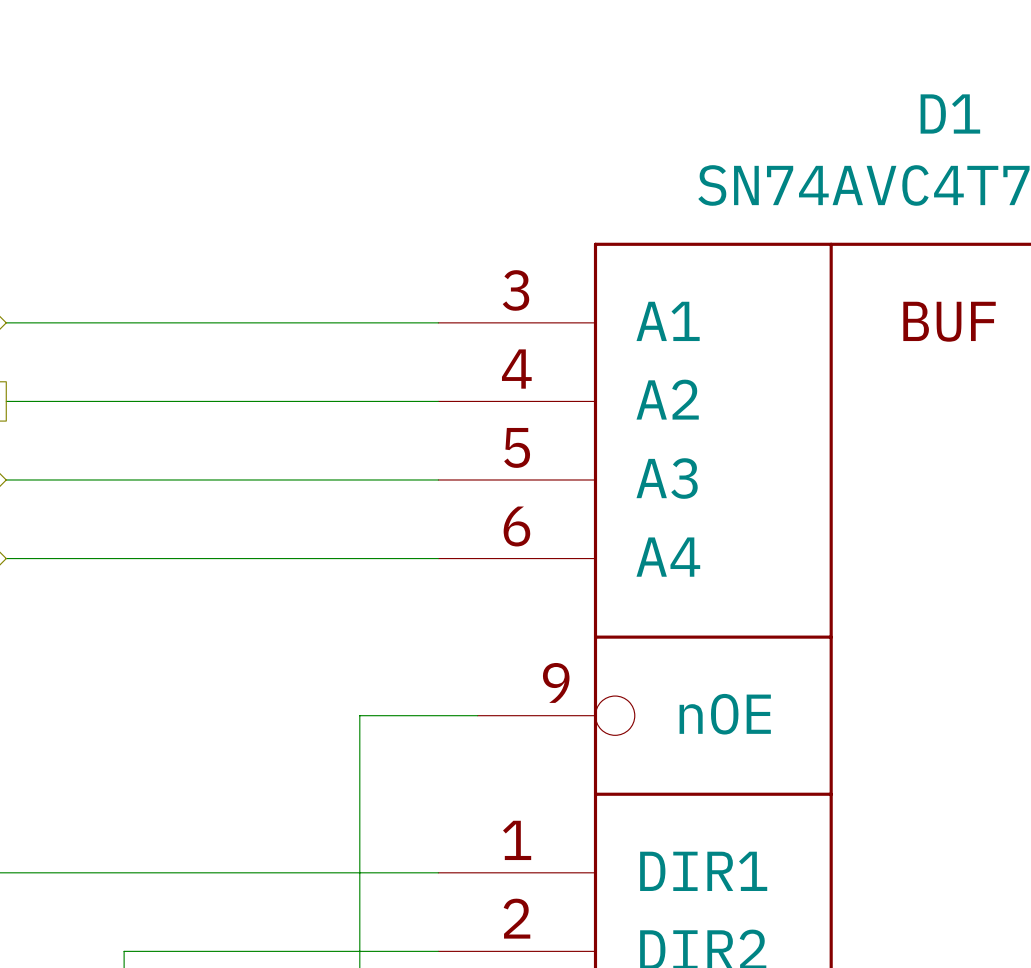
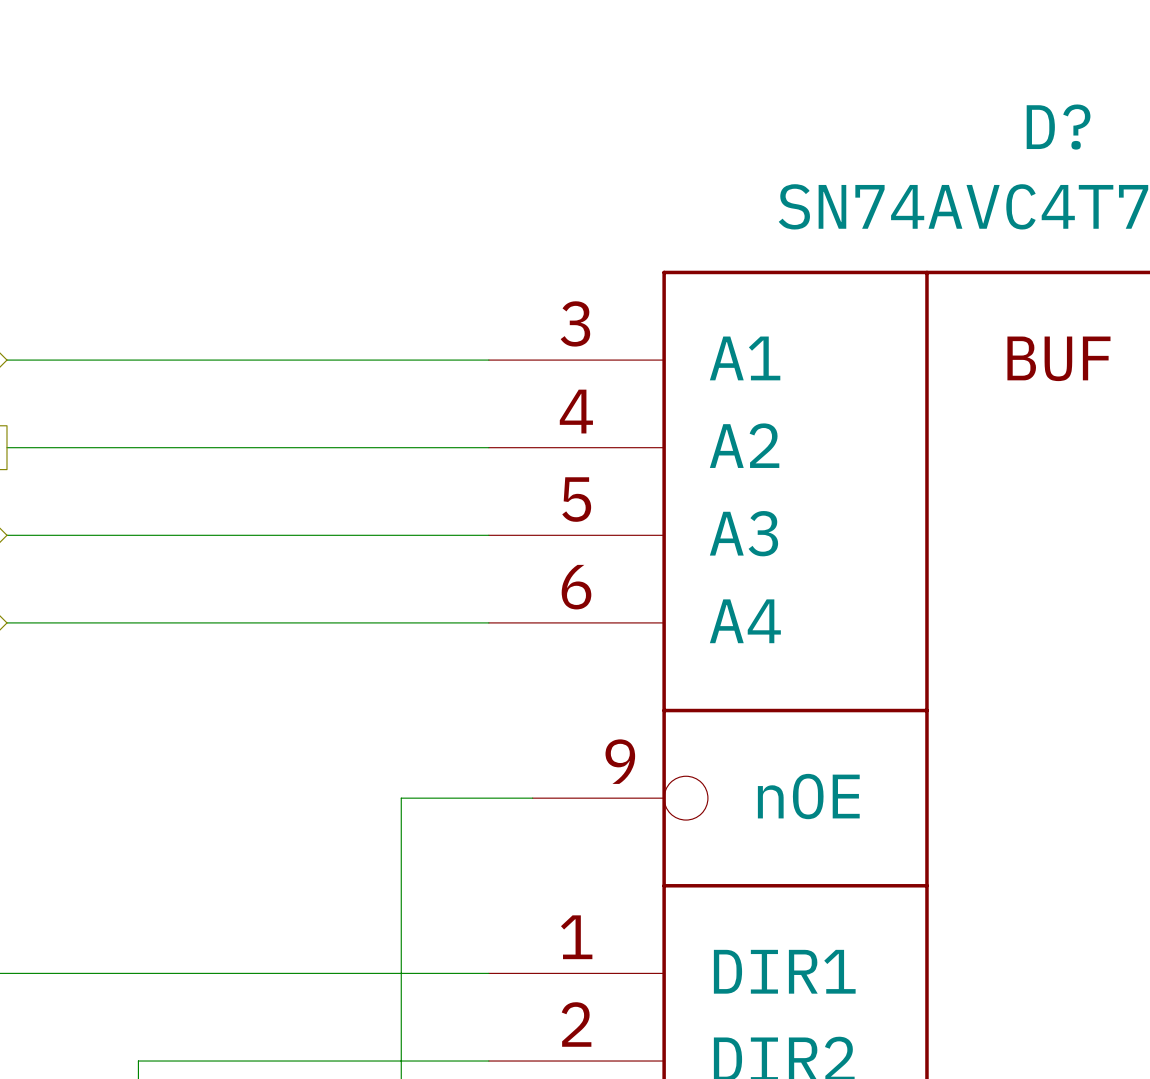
D1 name: D1 (950, 113) -> D? (1058, 127)

